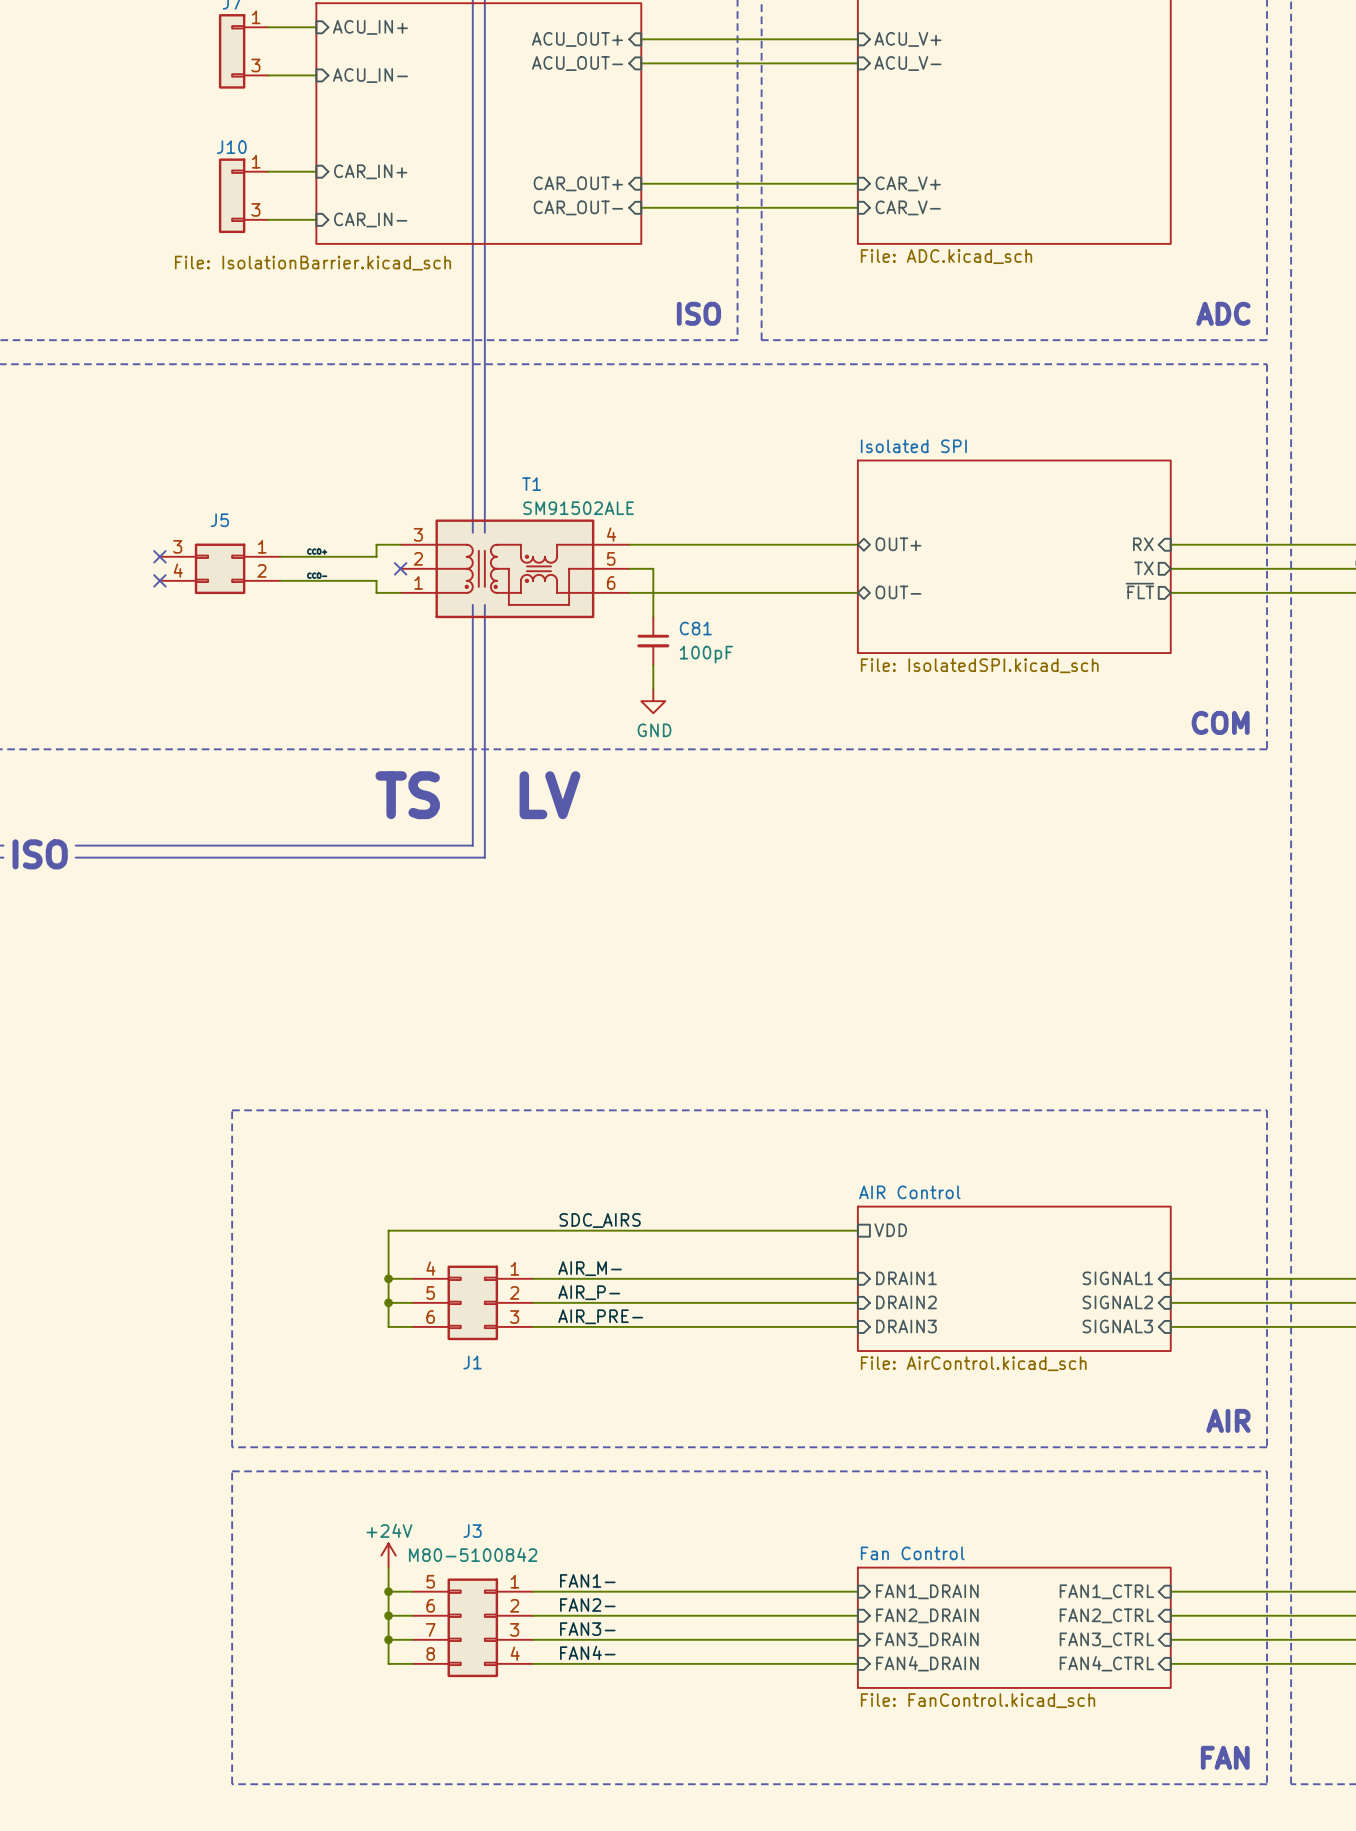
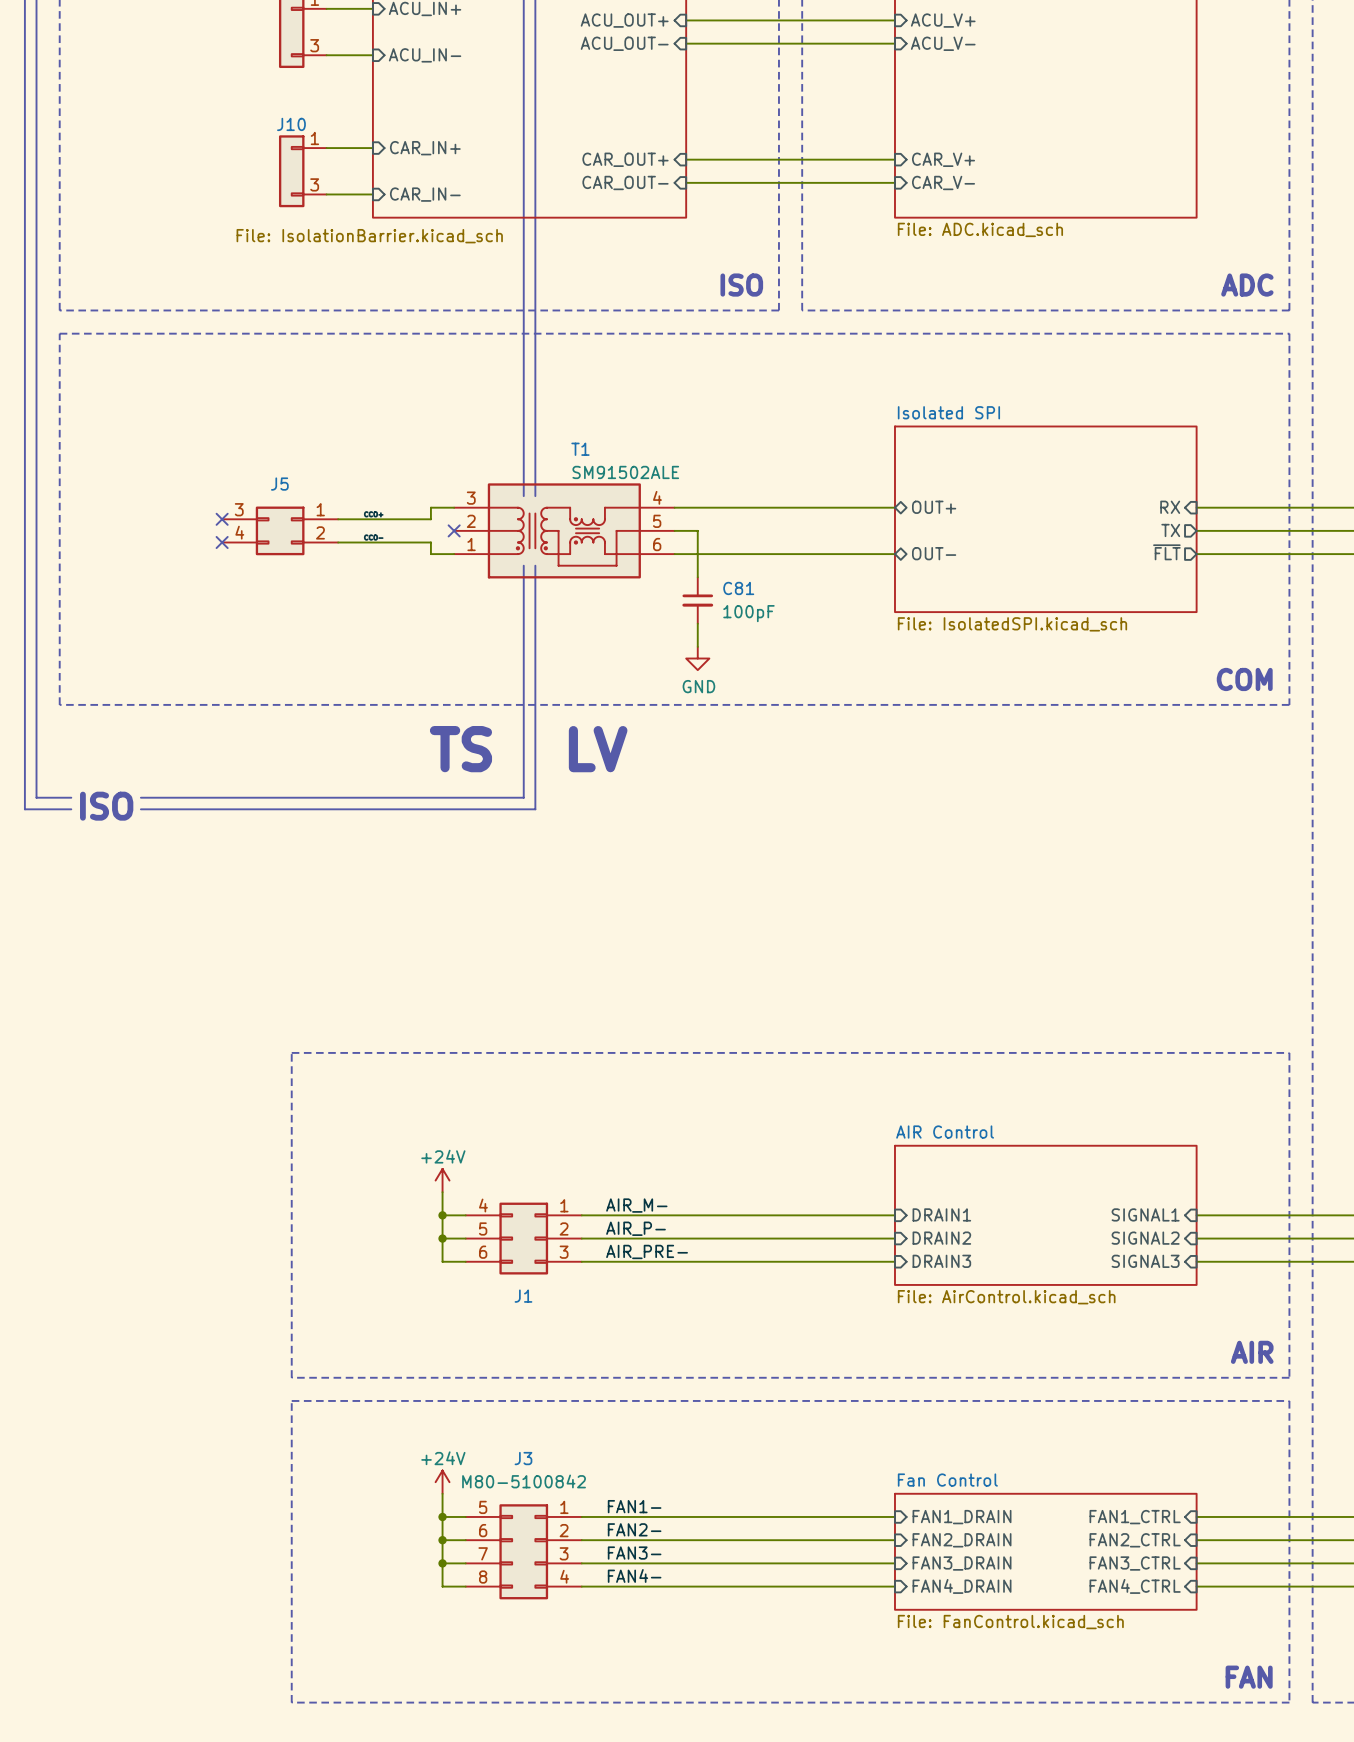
label: SDC_AIRS (600, 1220) -> none
wire: (857, 1230) (388, 1230) (388, 1254) -> none
sheet pin: VDD (890, 1230) -> none
power symbol: none -> +24V (442, 1180)

